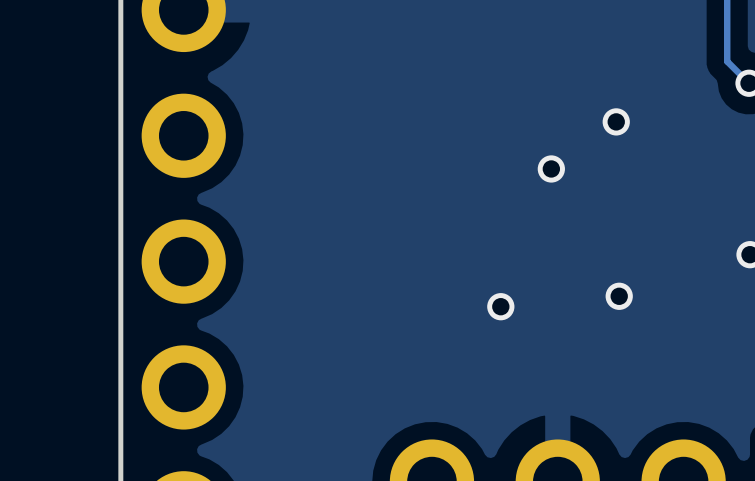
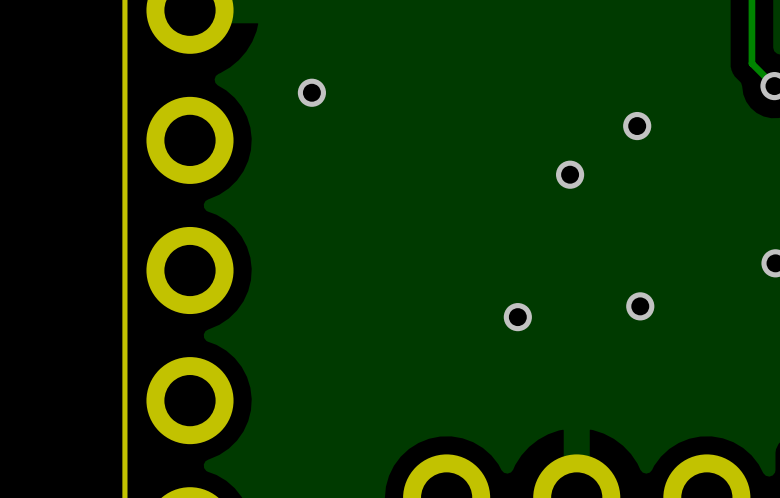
via: none -> (311, 92)

